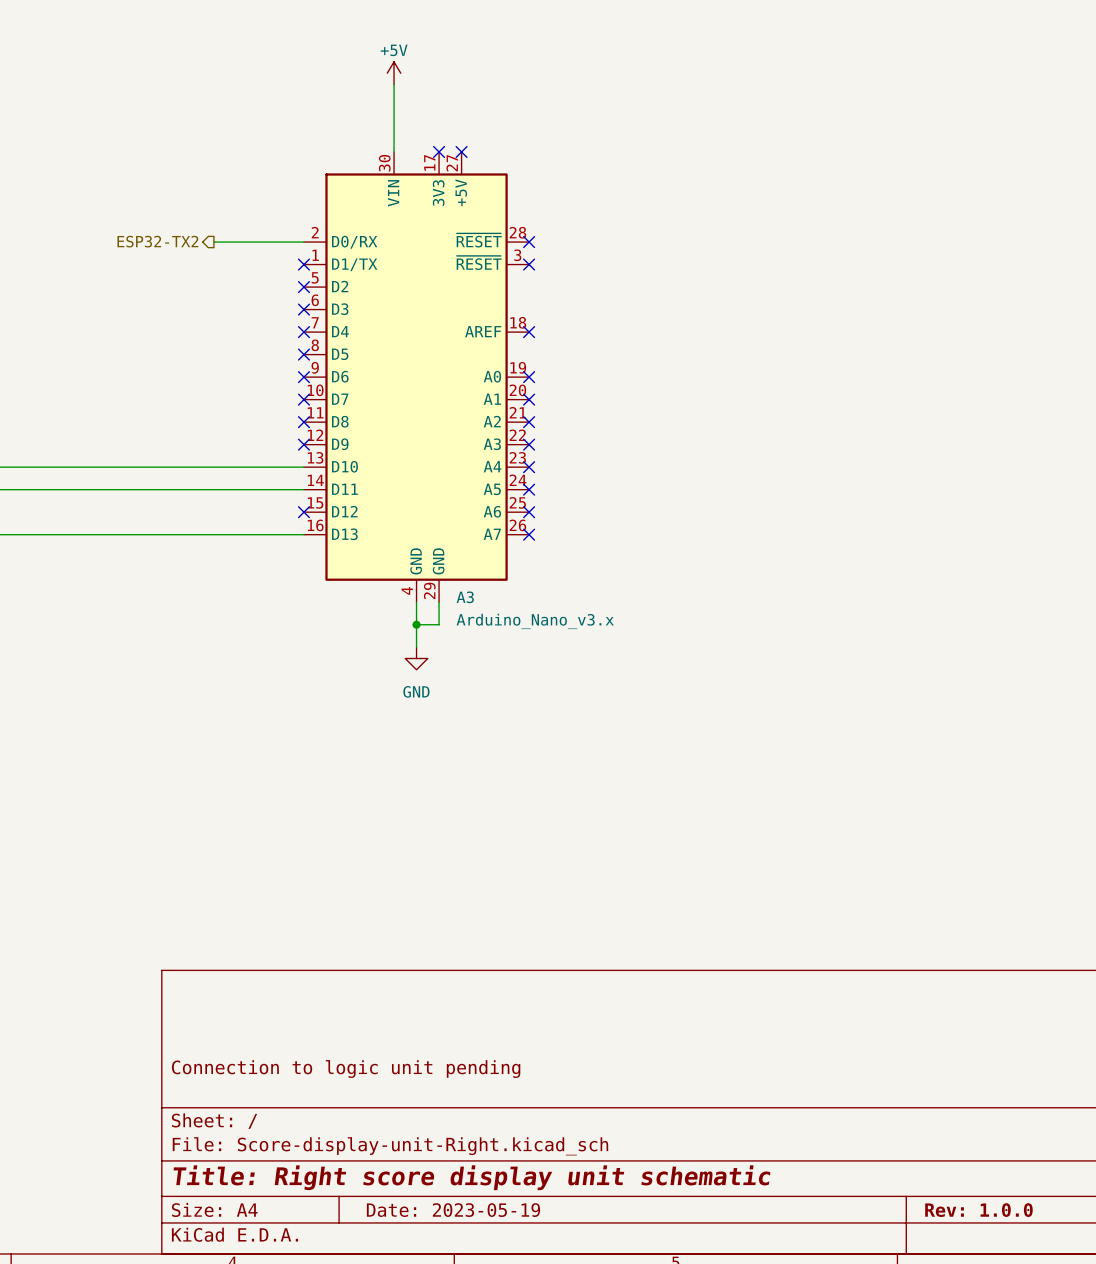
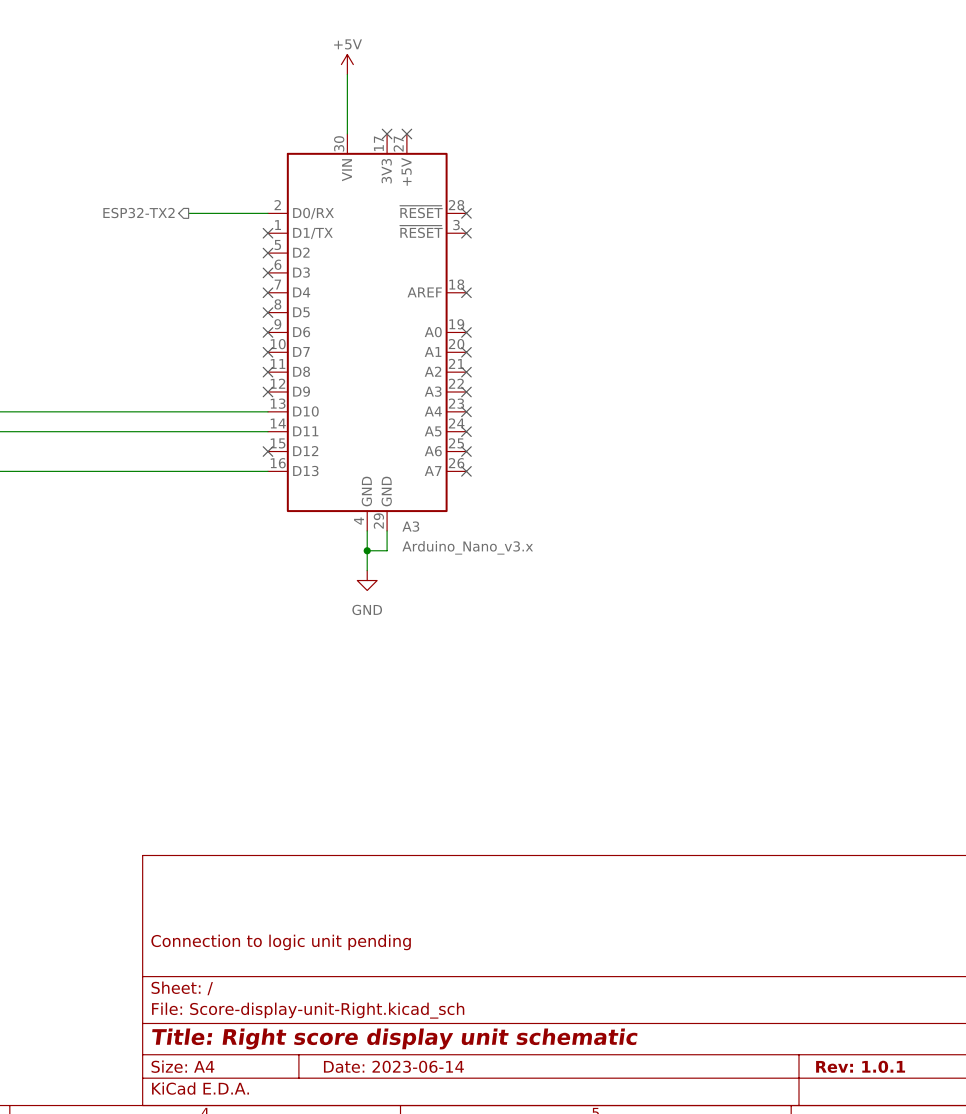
title block: Date: 2023-05-19 (453, 1210) -> Date: 2023-06-14 (393, 1066)
title block: Rev: 1.0.0 (978, 1210) -> Rev: 1.0.1 (860, 1066)

